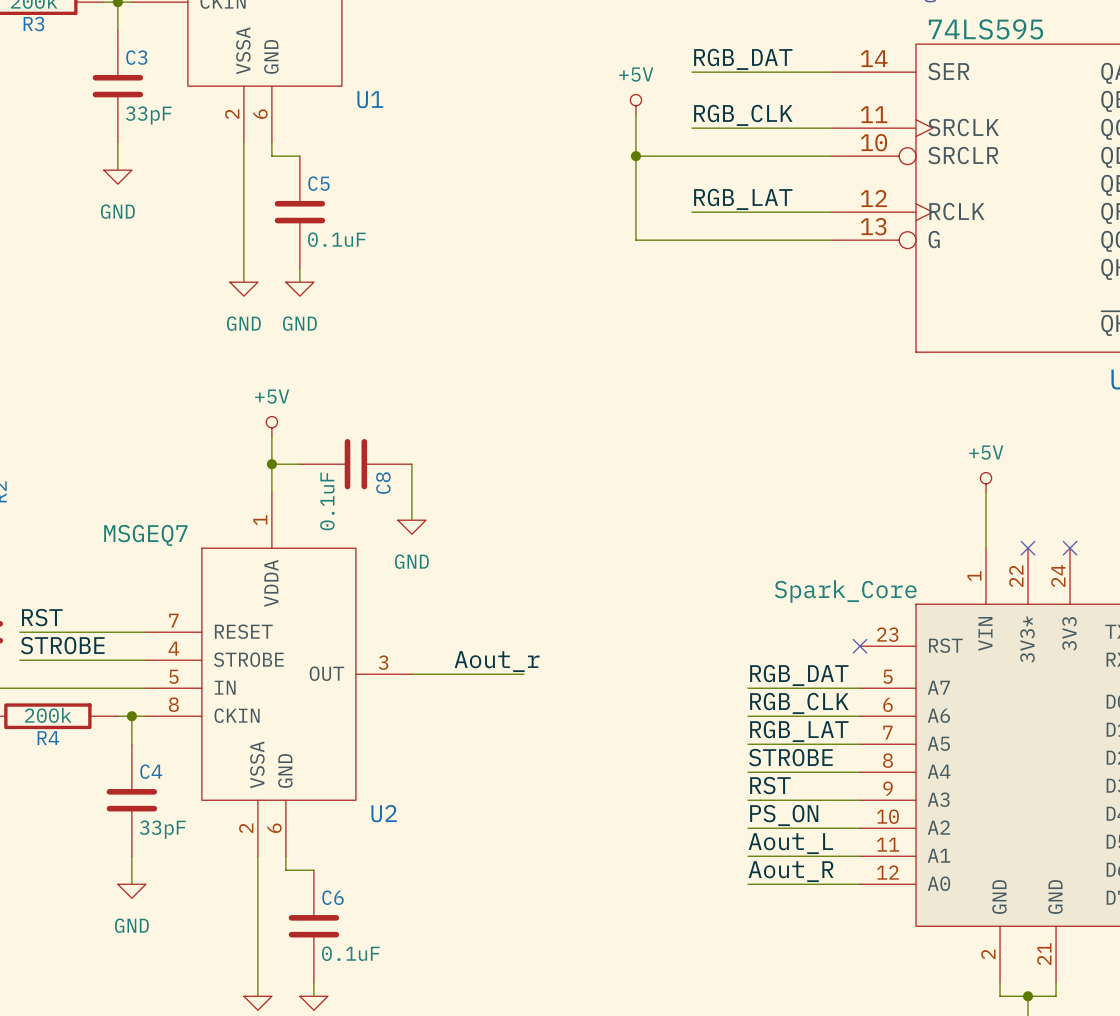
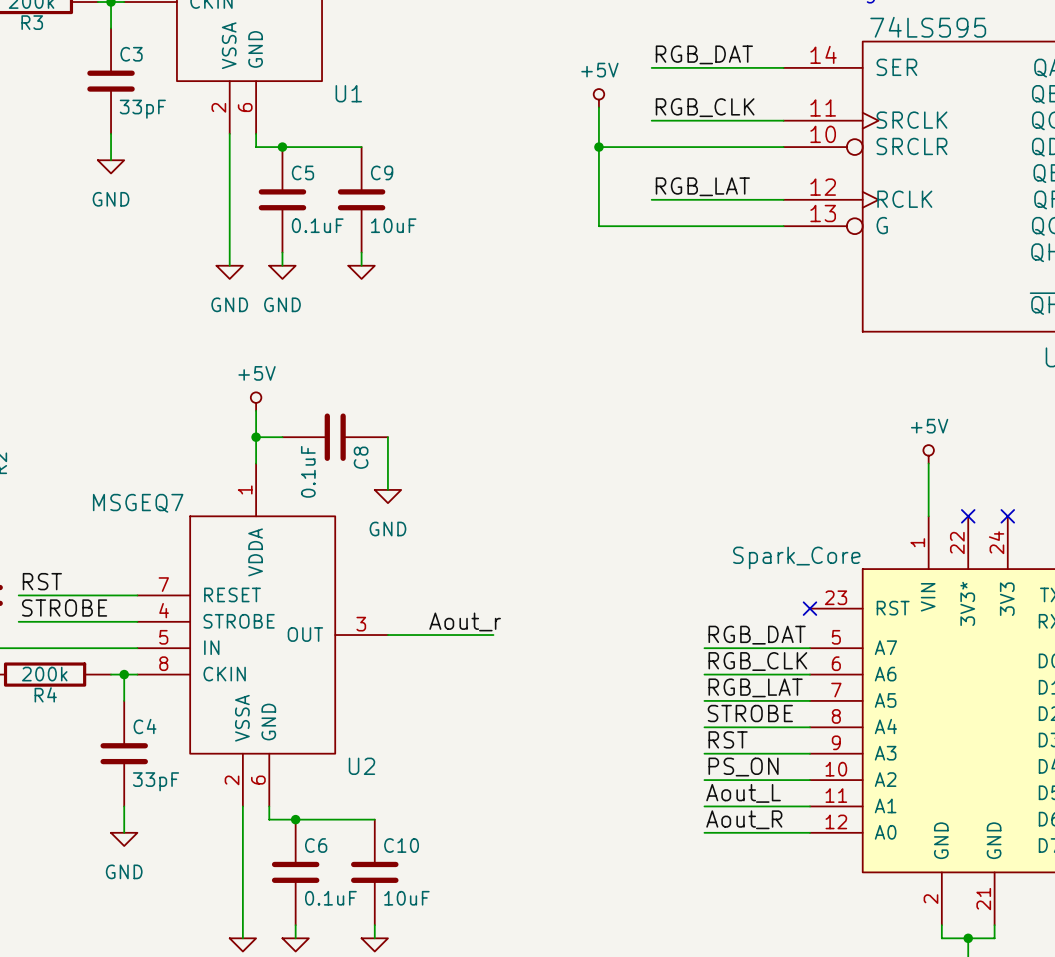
wire: none -> (282, 147) (361, 147)
junction: none -> (282, 147)
C9: none -> 10uF (361, 199)
wire: none -> (361, 252) (361, 265)
power symbol: none -> (361, 272)
wire: none -> (295, 819) (374, 819)
junction: none -> (295, 819)
C10: none -> 10uF (374, 872)
wire: none -> (374, 925) (374, 938)
power symbol: none -> (374, 944)

